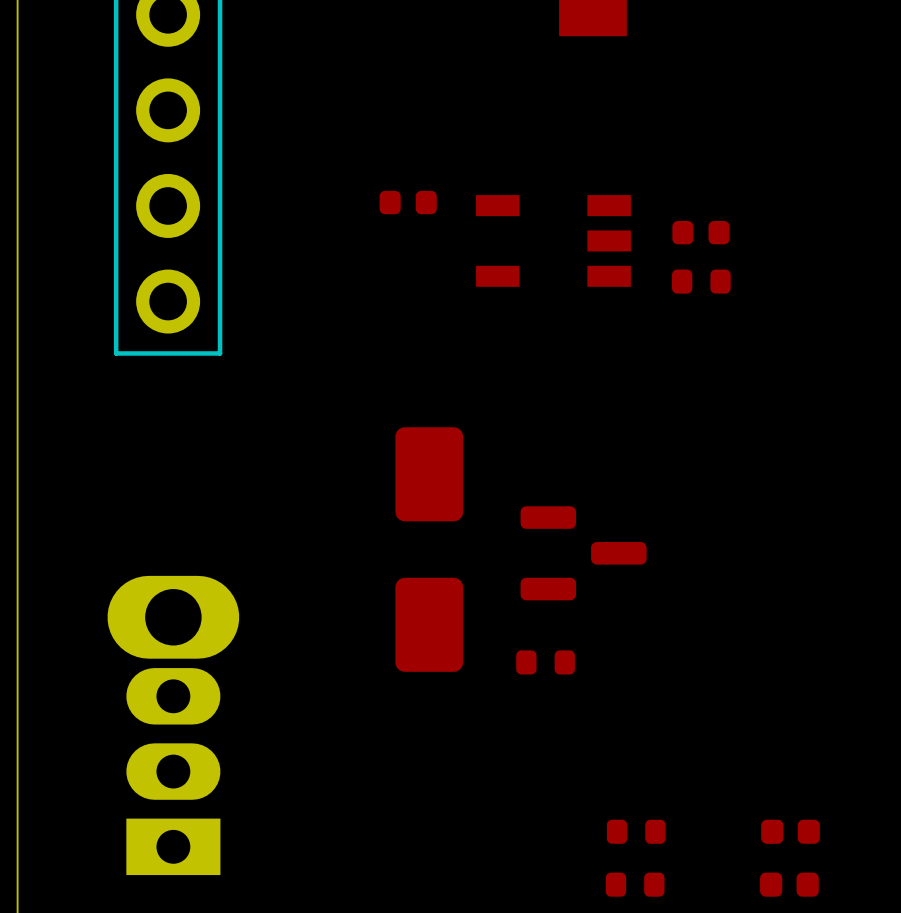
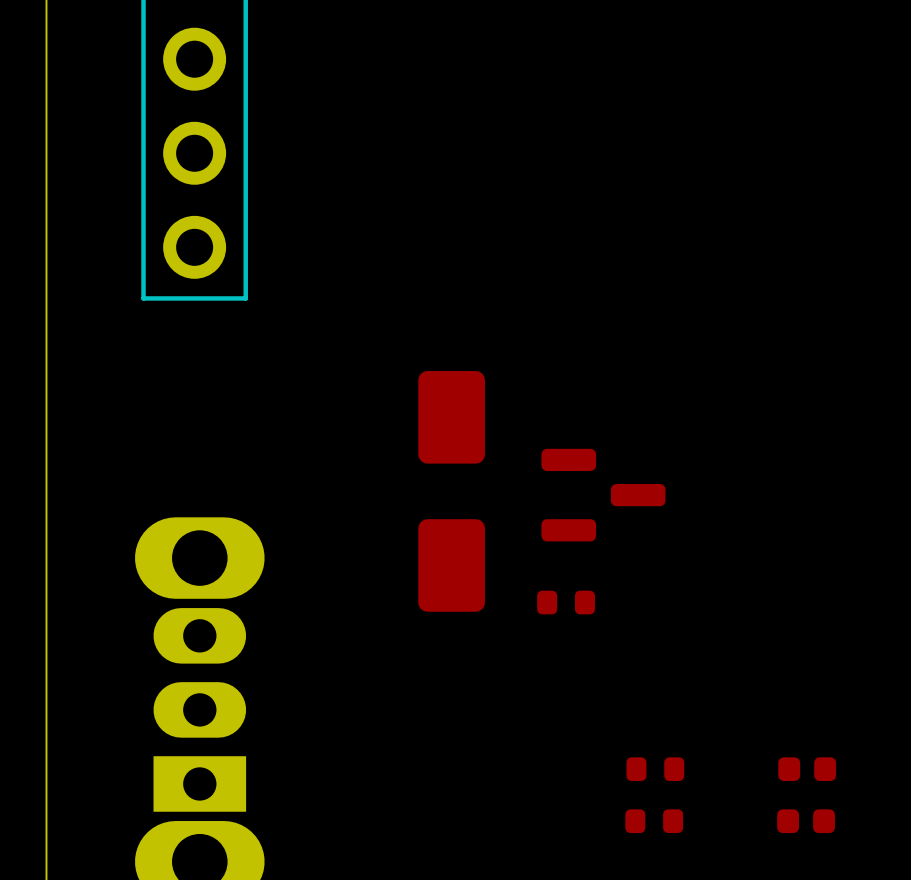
part: (408, 202) -> none
part: (700, 232) -> none
part: (553, 240) -> none
part: (701, 281) -> none

